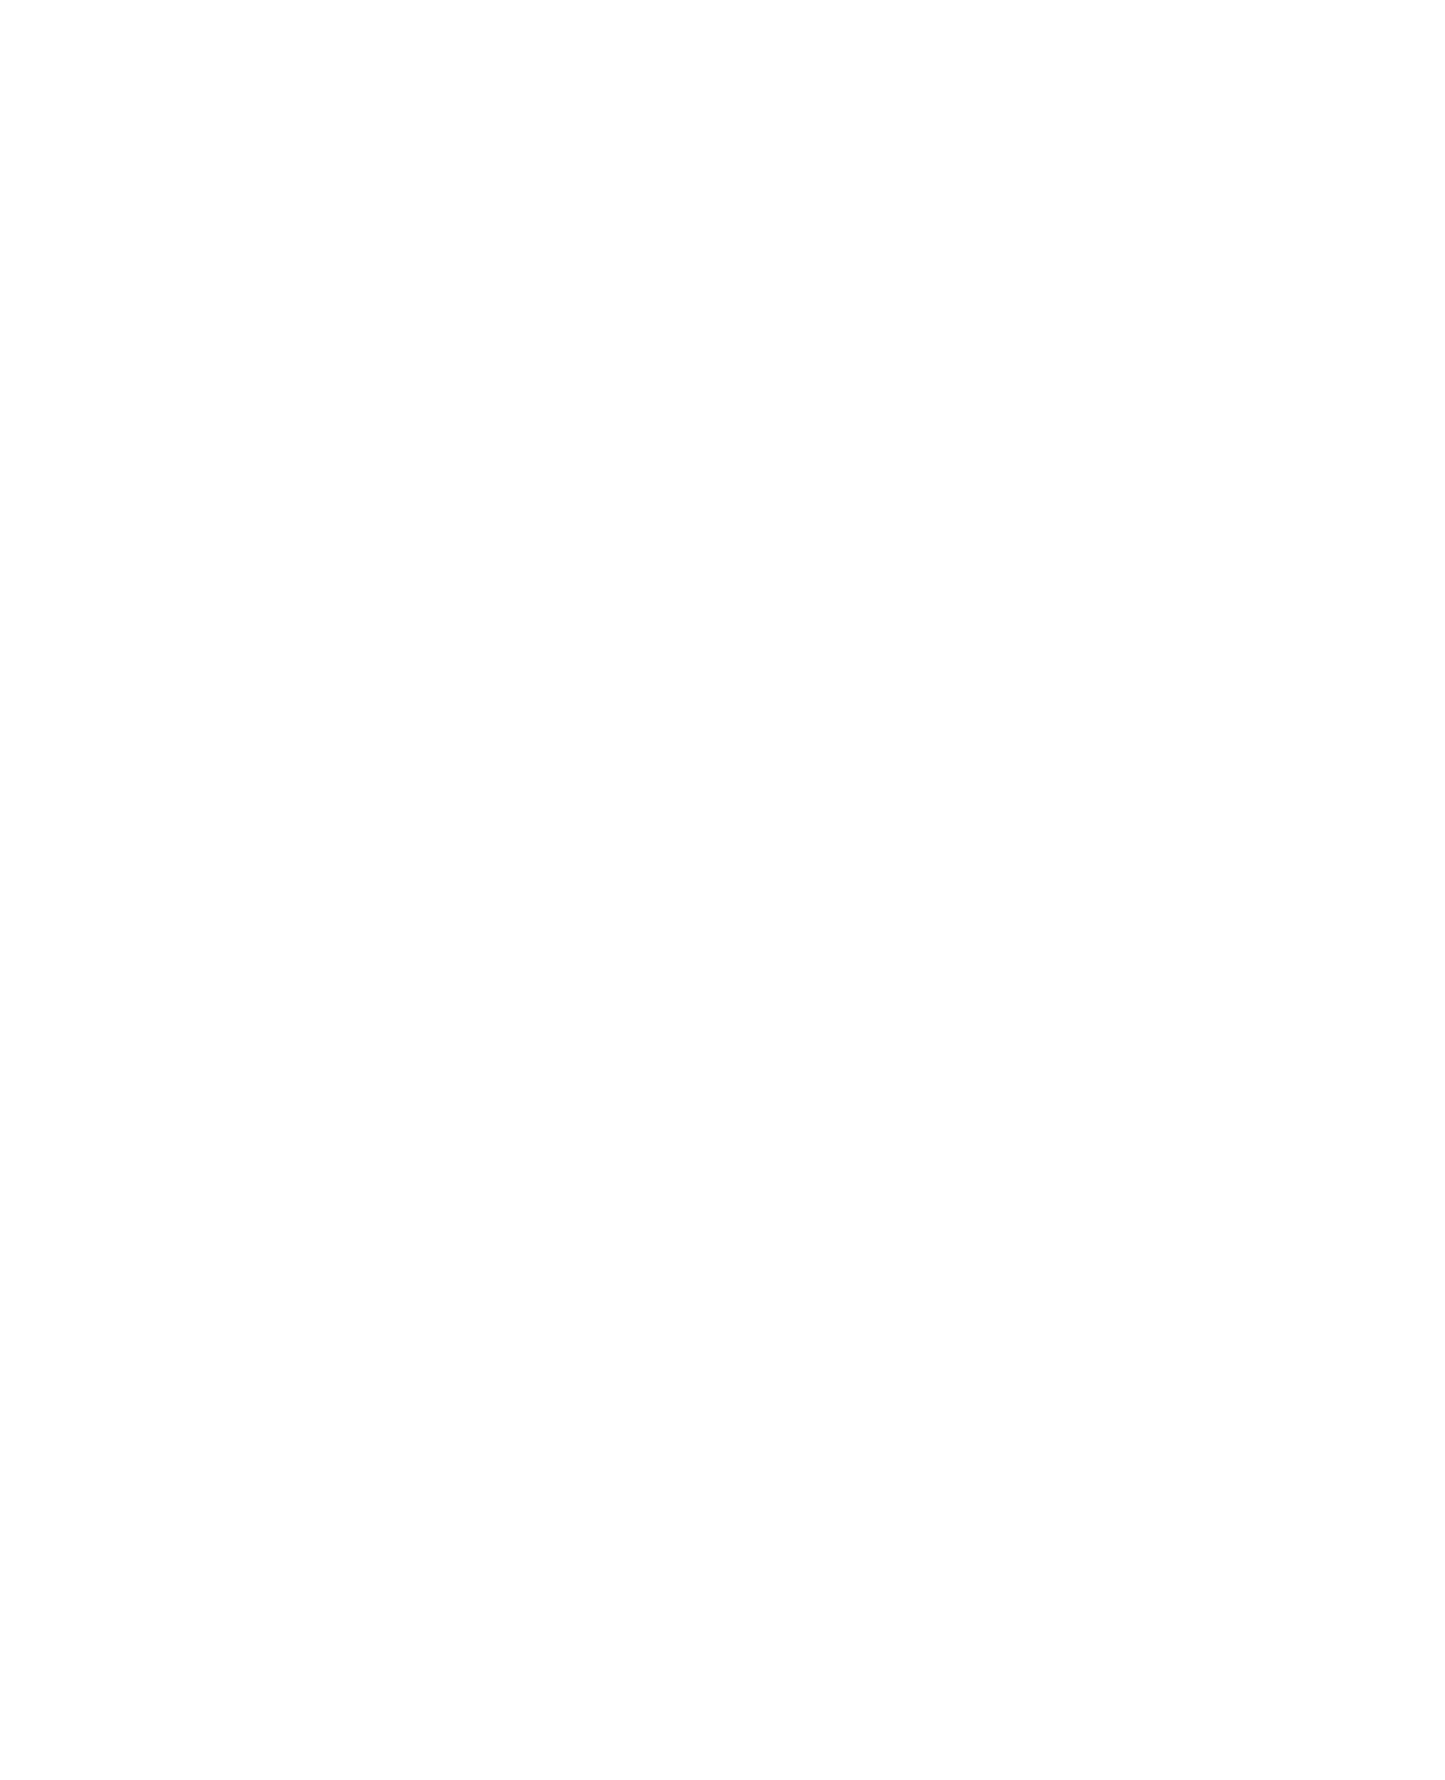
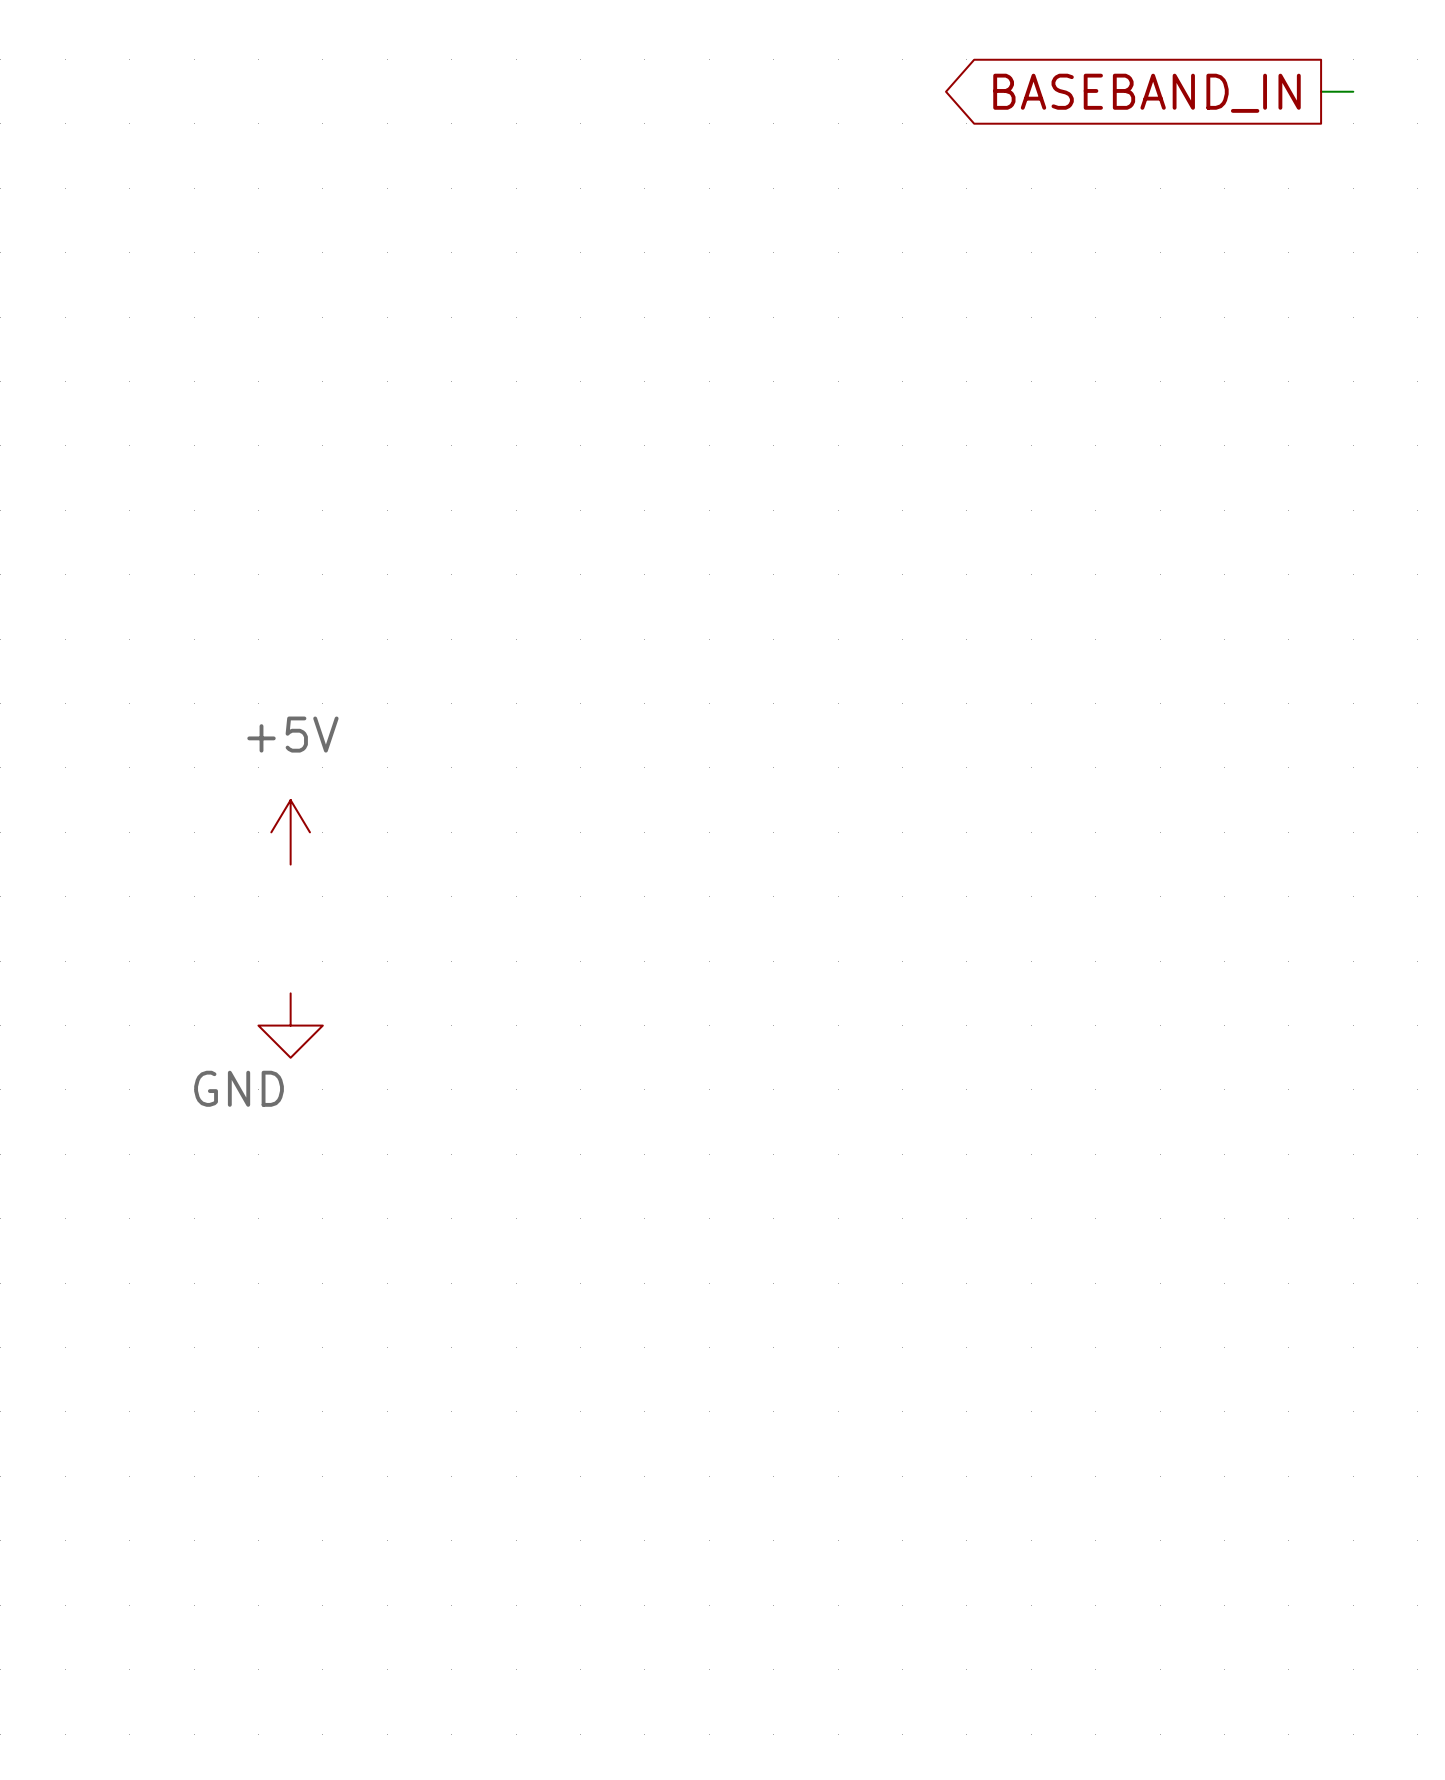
wire: none -> (1321, 91) (1353, 91)
global label: none -> BASEBAND_IN (1146, 93)
power symbol: none -> +5V (290, 832)
power symbol: none -> GND (290, 1025)

